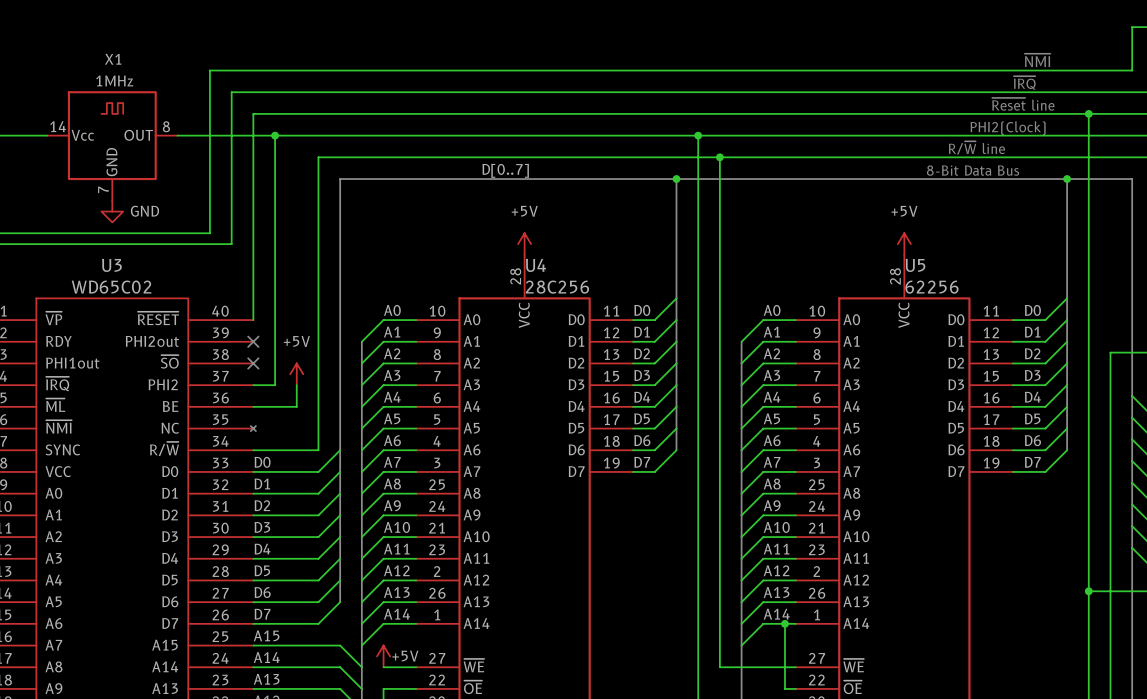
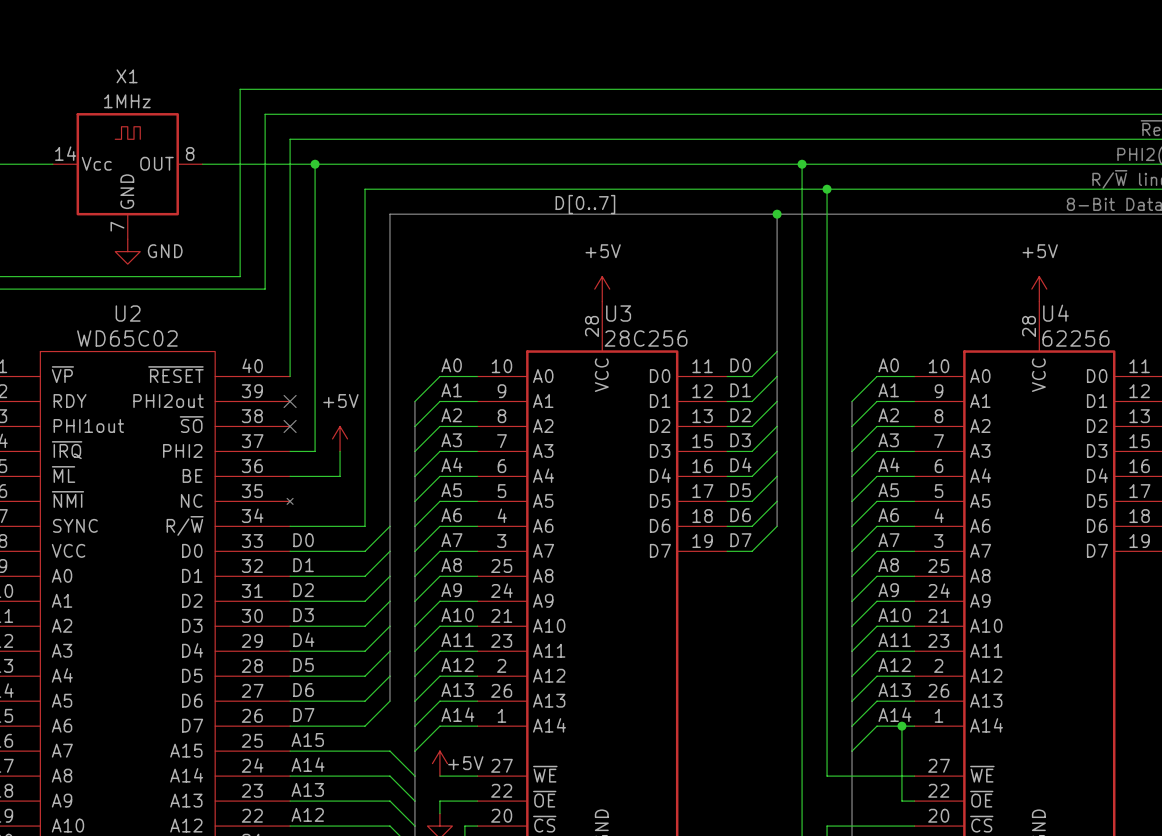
U3 name: U3 (111, 265) -> U2 (128, 313)
U4 name: U4 (535, 265) -> U3 (618, 313)
U5 name: U5 (915, 265) -> U4 (1056, 313)

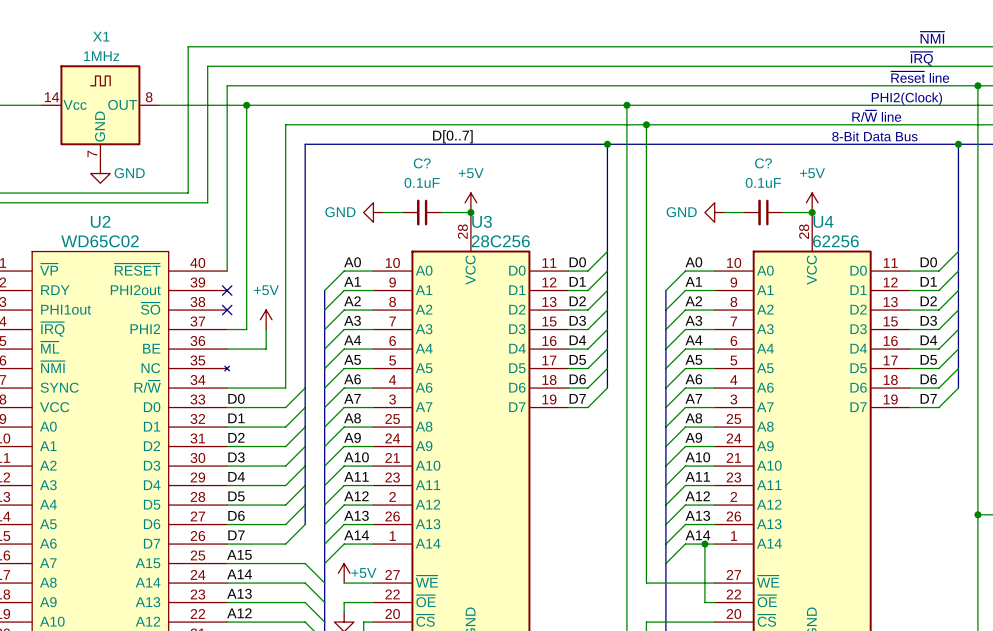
power symbol: none -> GND (373, 212)
wire: none -> (383, 212) (402, 212)
C?: none -> 0.1uF (422, 212)
wire: none -> (441, 212) (470, 212)
junction: none -> (470, 212)
power symbol: none -> GND (714, 212)
wire: none -> (724, 212) (743, 212)
C?: none -> 0.1uF (763, 212)
wire: none -> (782, 212) (812, 212)
junction: none -> (812, 212)

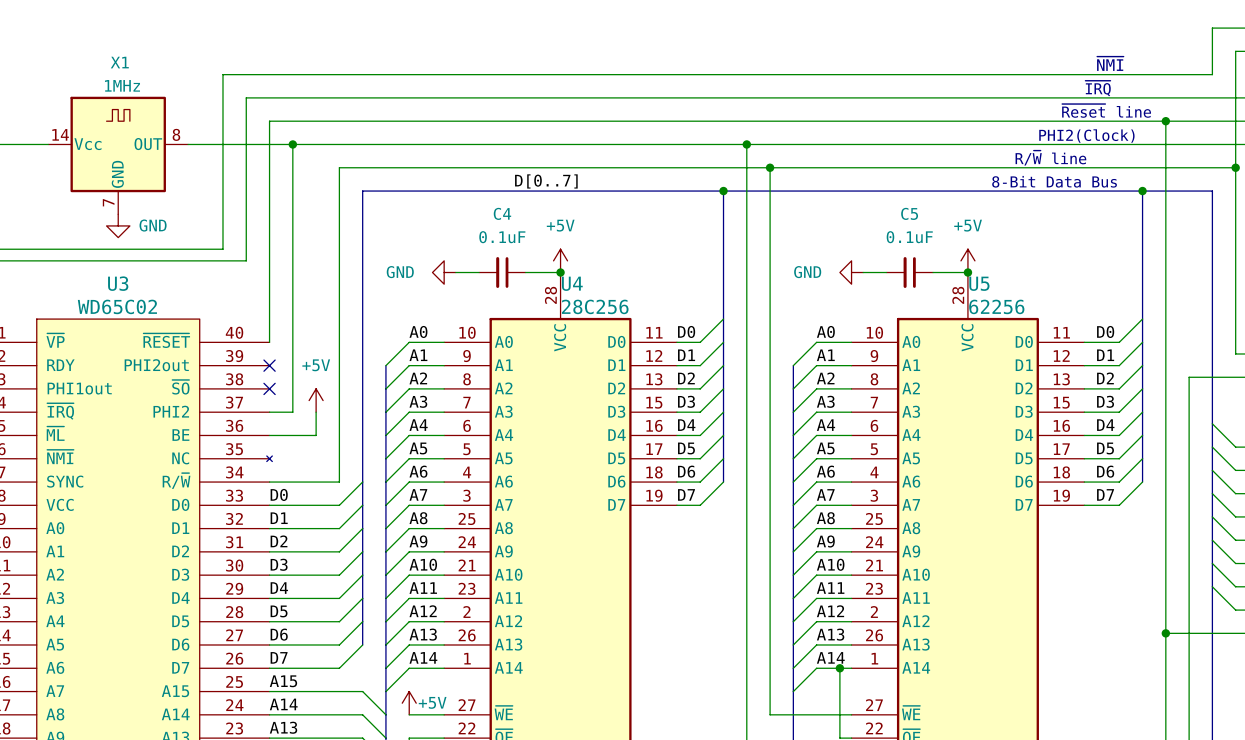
C? name: C? (422, 163) -> C4 (502, 213)
C? name: C? (763, 163) -> C5 (909, 213)
U2 name: U2 (100, 221) -> U3 (118, 283)
U3 name: U3 (482, 221) -> U4 (572, 283)
U4 name: U4 (823, 221) -> U5 (979, 283)

